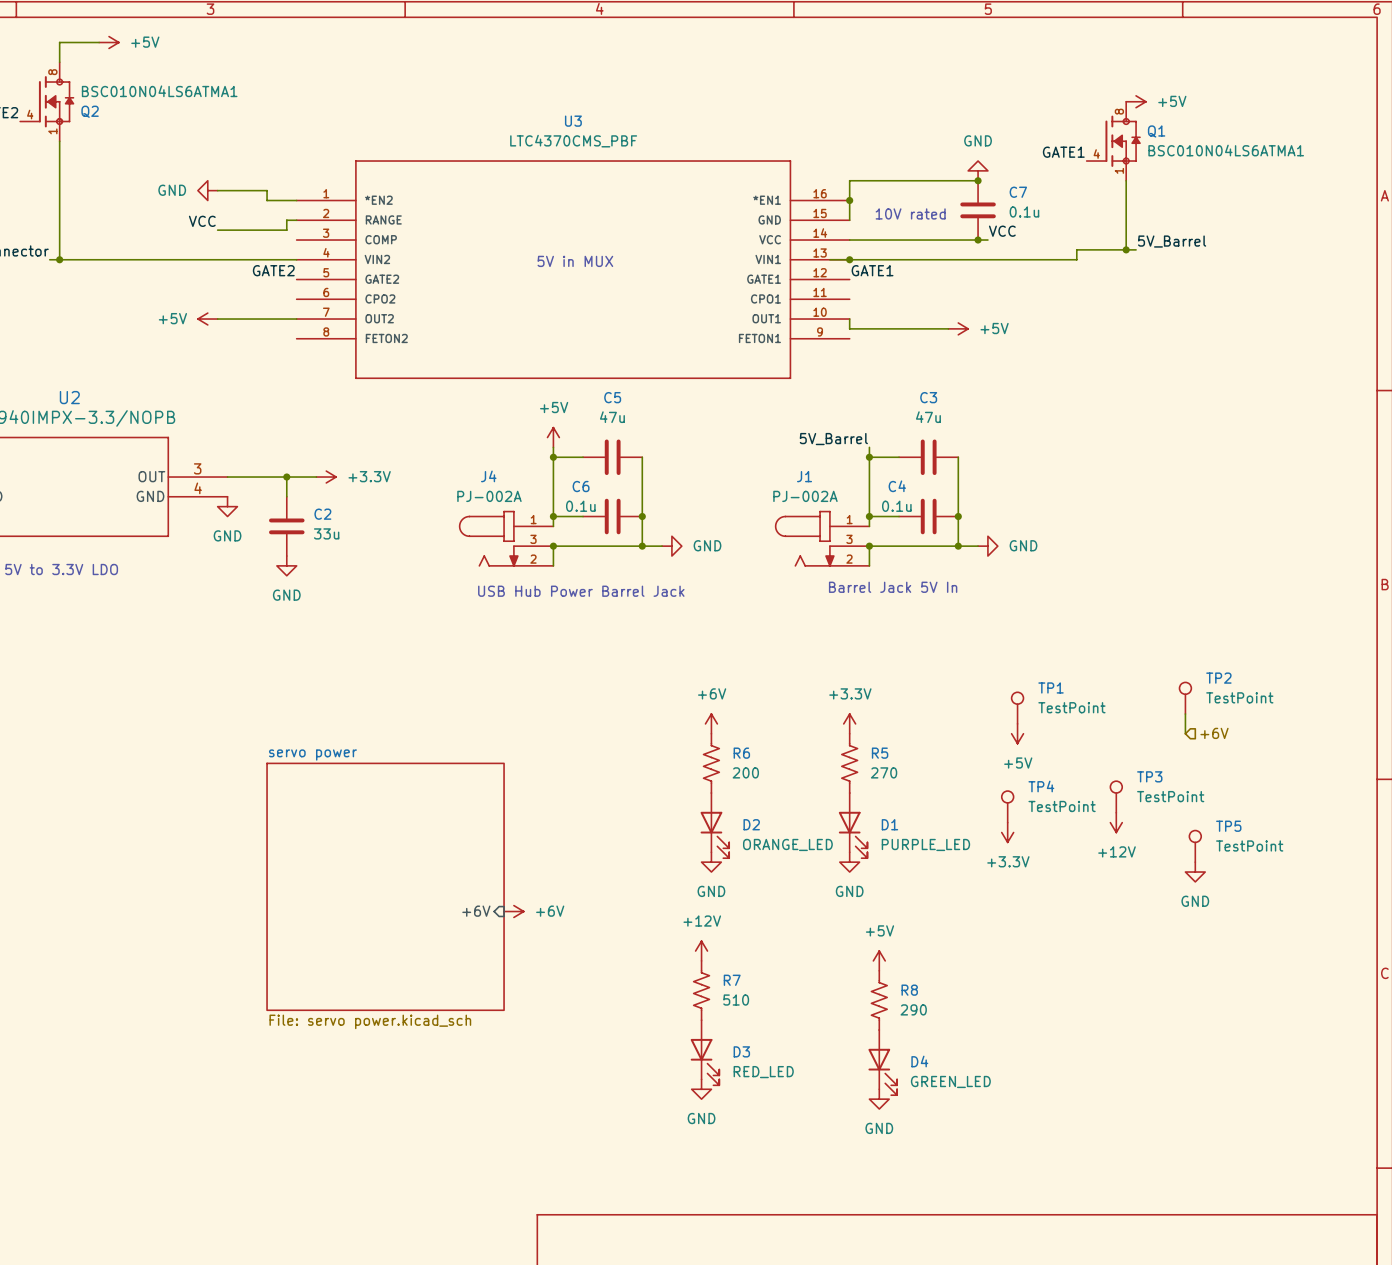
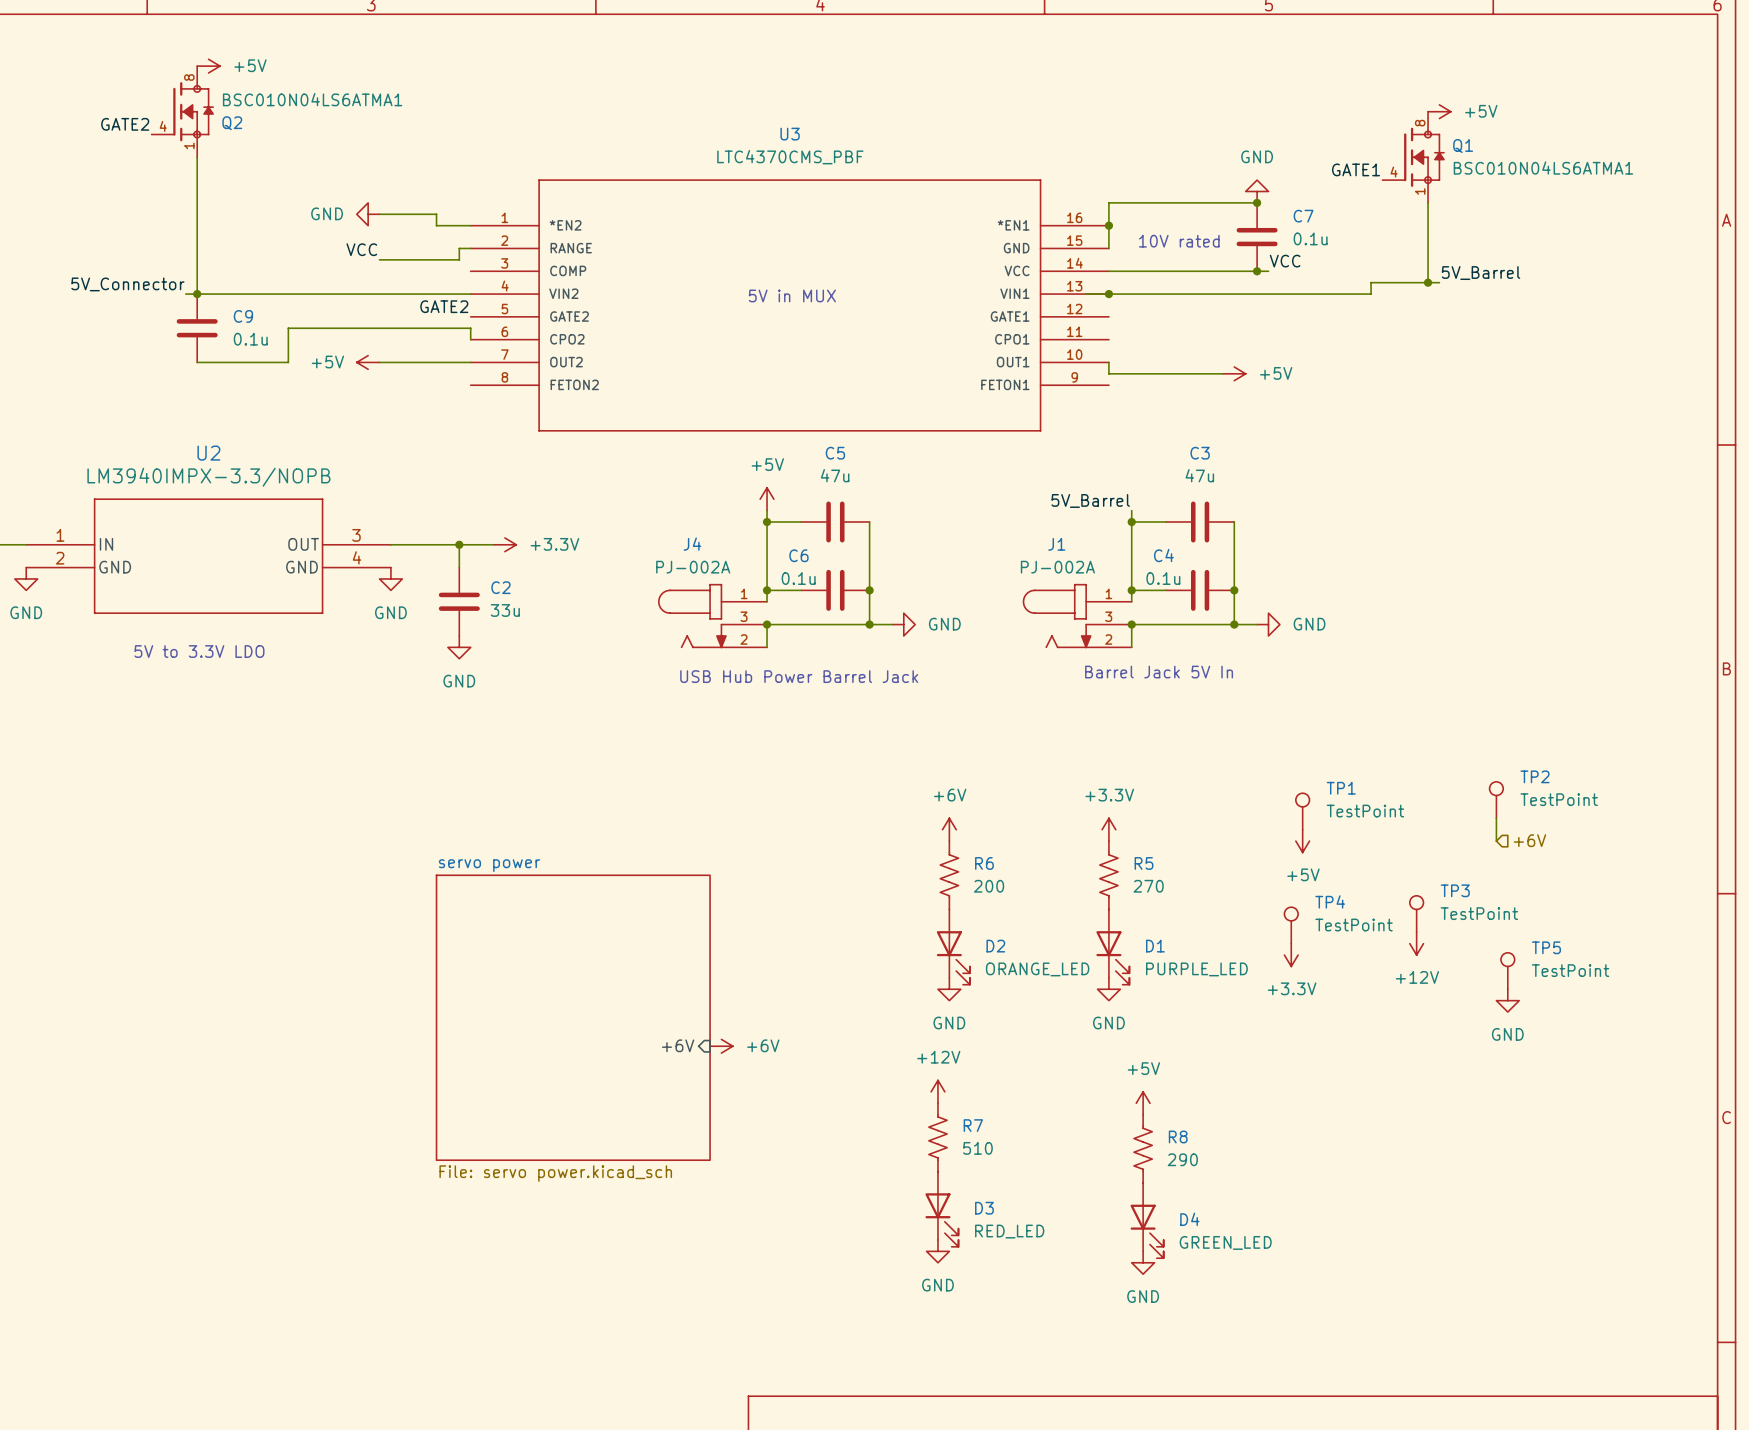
wire: (99, 42) (59, 42) (59, 62) -> none
power symbol position: +5V (109, 42) -> +5V (208, 66)
label: GATE1 (872, 270) -> none
C9: none -> 0.1u (197, 328)
wire: none -> (470, 339) (470, 328) (288, 328) (288, 362) (197, 362)

